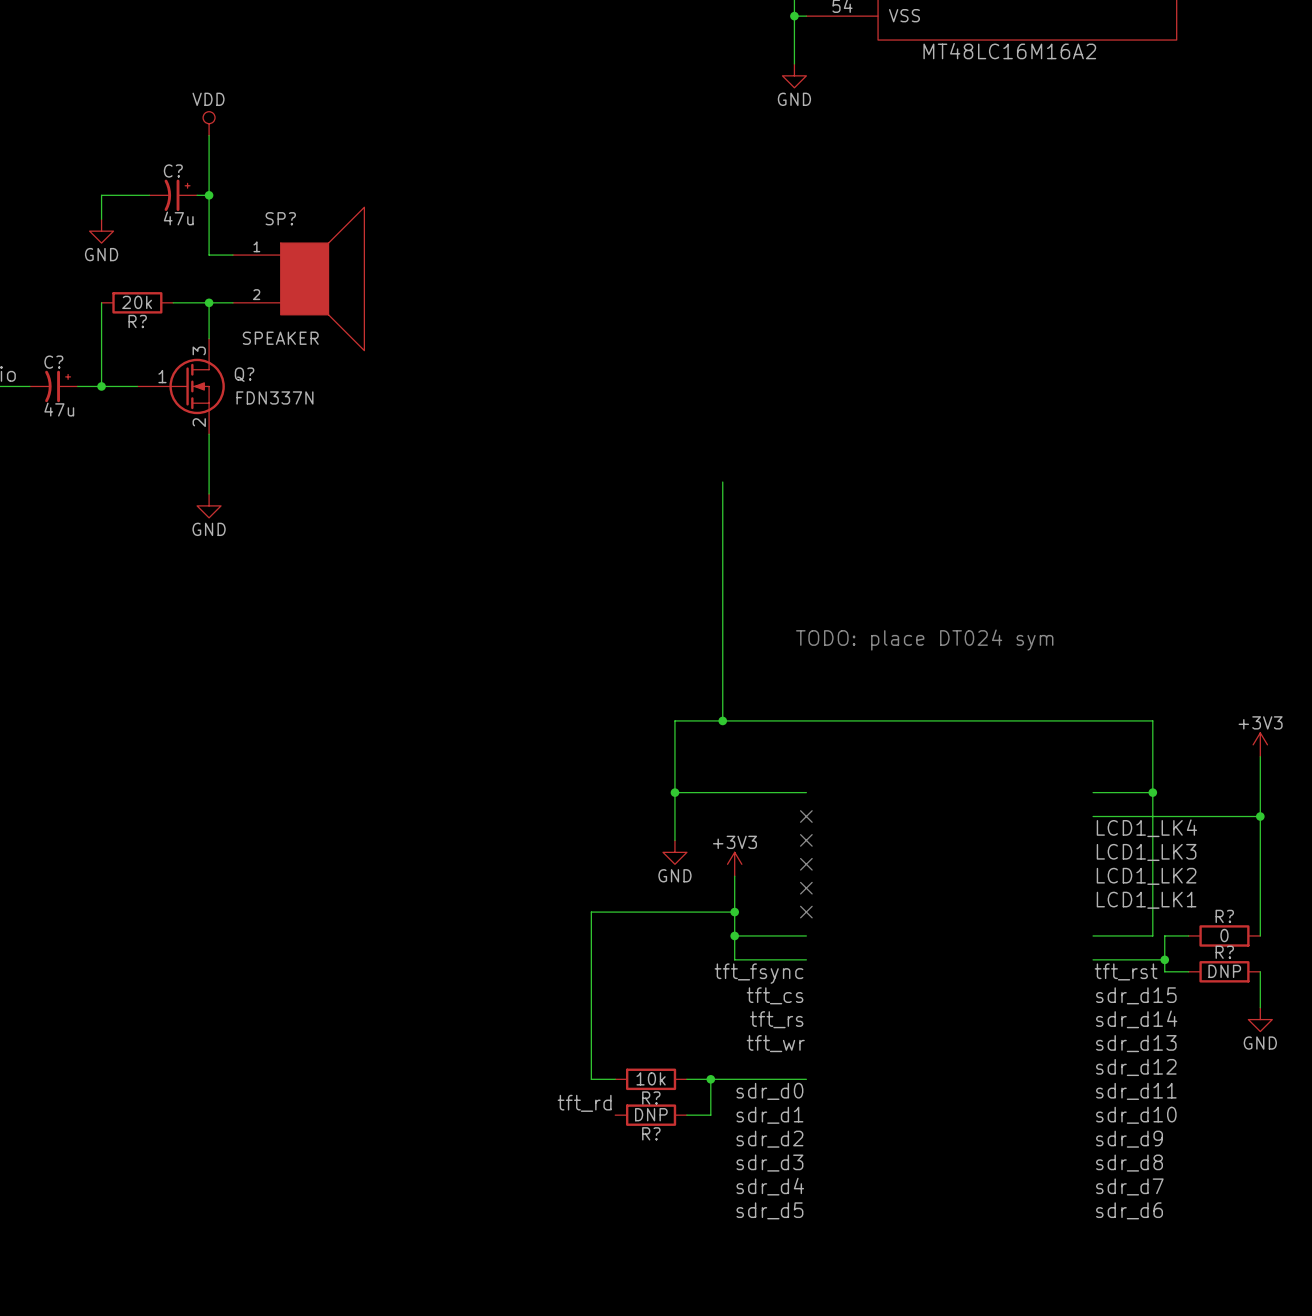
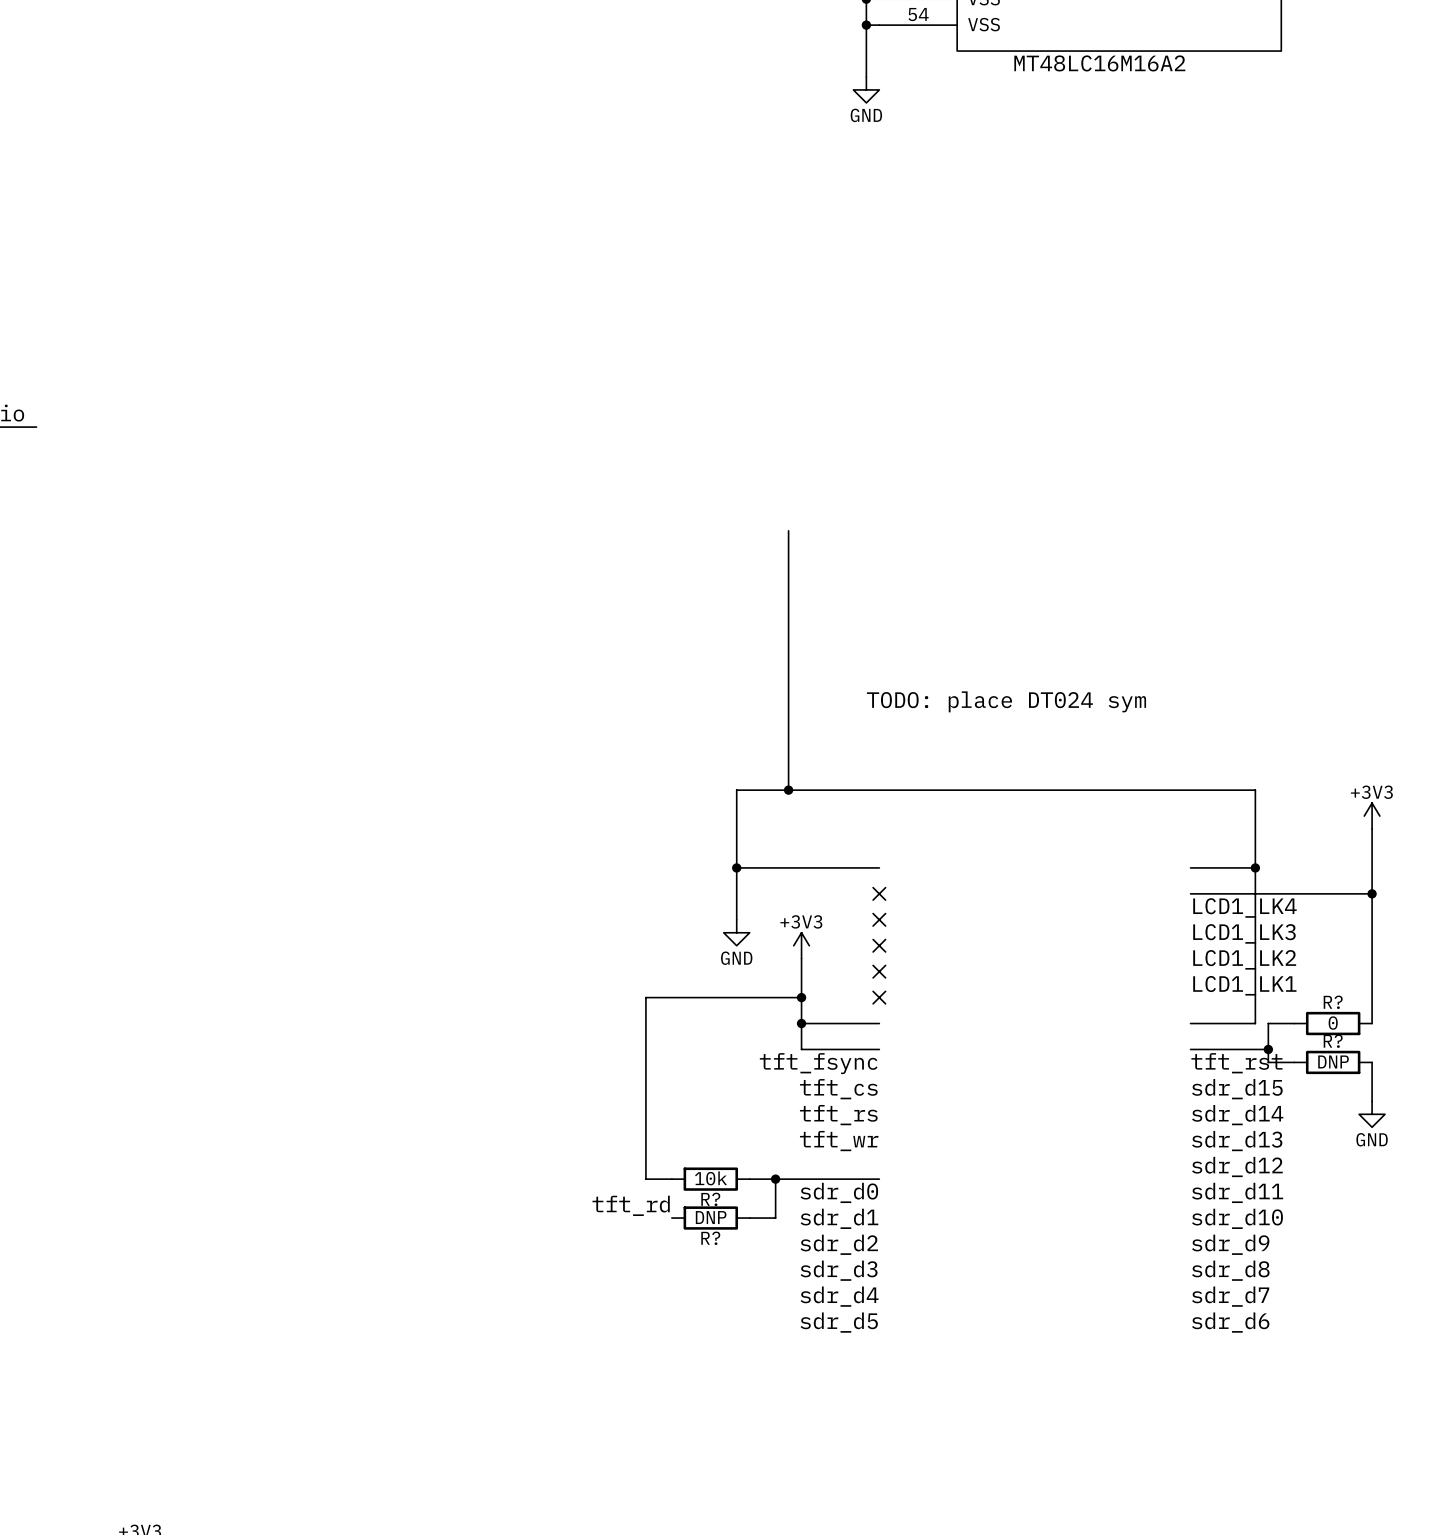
power symbol: VDD (209, 123) -> none
wire: (209, 135) (209, 255) (232, 255) -> none
wire: (149, 195) (101, 195) (101, 219) -> none
C?: 47u (173, 195) -> none
wire: (197, 195) (209, 195) -> none
junction: (209, 195) -> none
power symbol: GND (101, 231) -> none
SP?: SPEAKER (298, 278) -> none
wire: (101, 302) (101, 386) -> none
R?: 20k (137, 302) -> none
wire: (173, 302) (232, 302) -> none
wire: (209, 302) (209, 338) -> none
junction: (209, 302) -> none
C?: 47u (53, 386) -> none
wire: (77, 386) (137, 386) -> none
junction: (101, 386) -> none
Q?: FDN337N (181, 386) -> none
wire: (209, 434) (209, 493) -> none
power symbol: GND (209, 505) -> none

